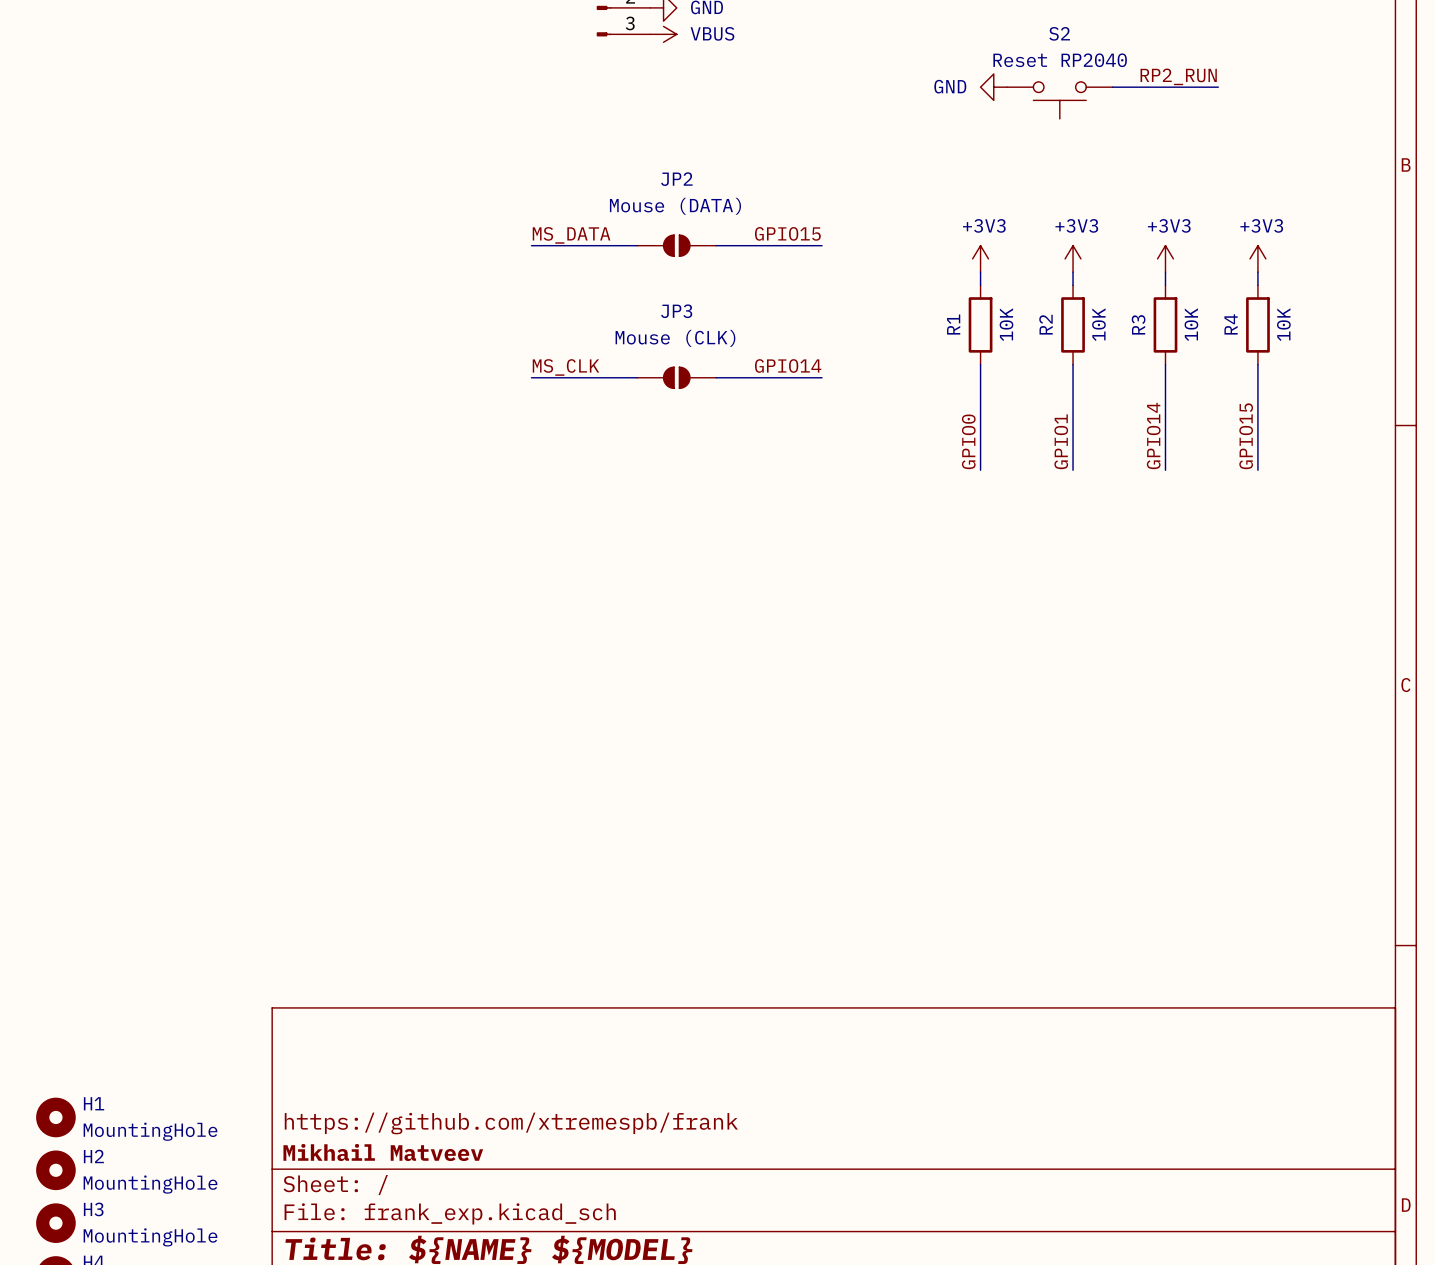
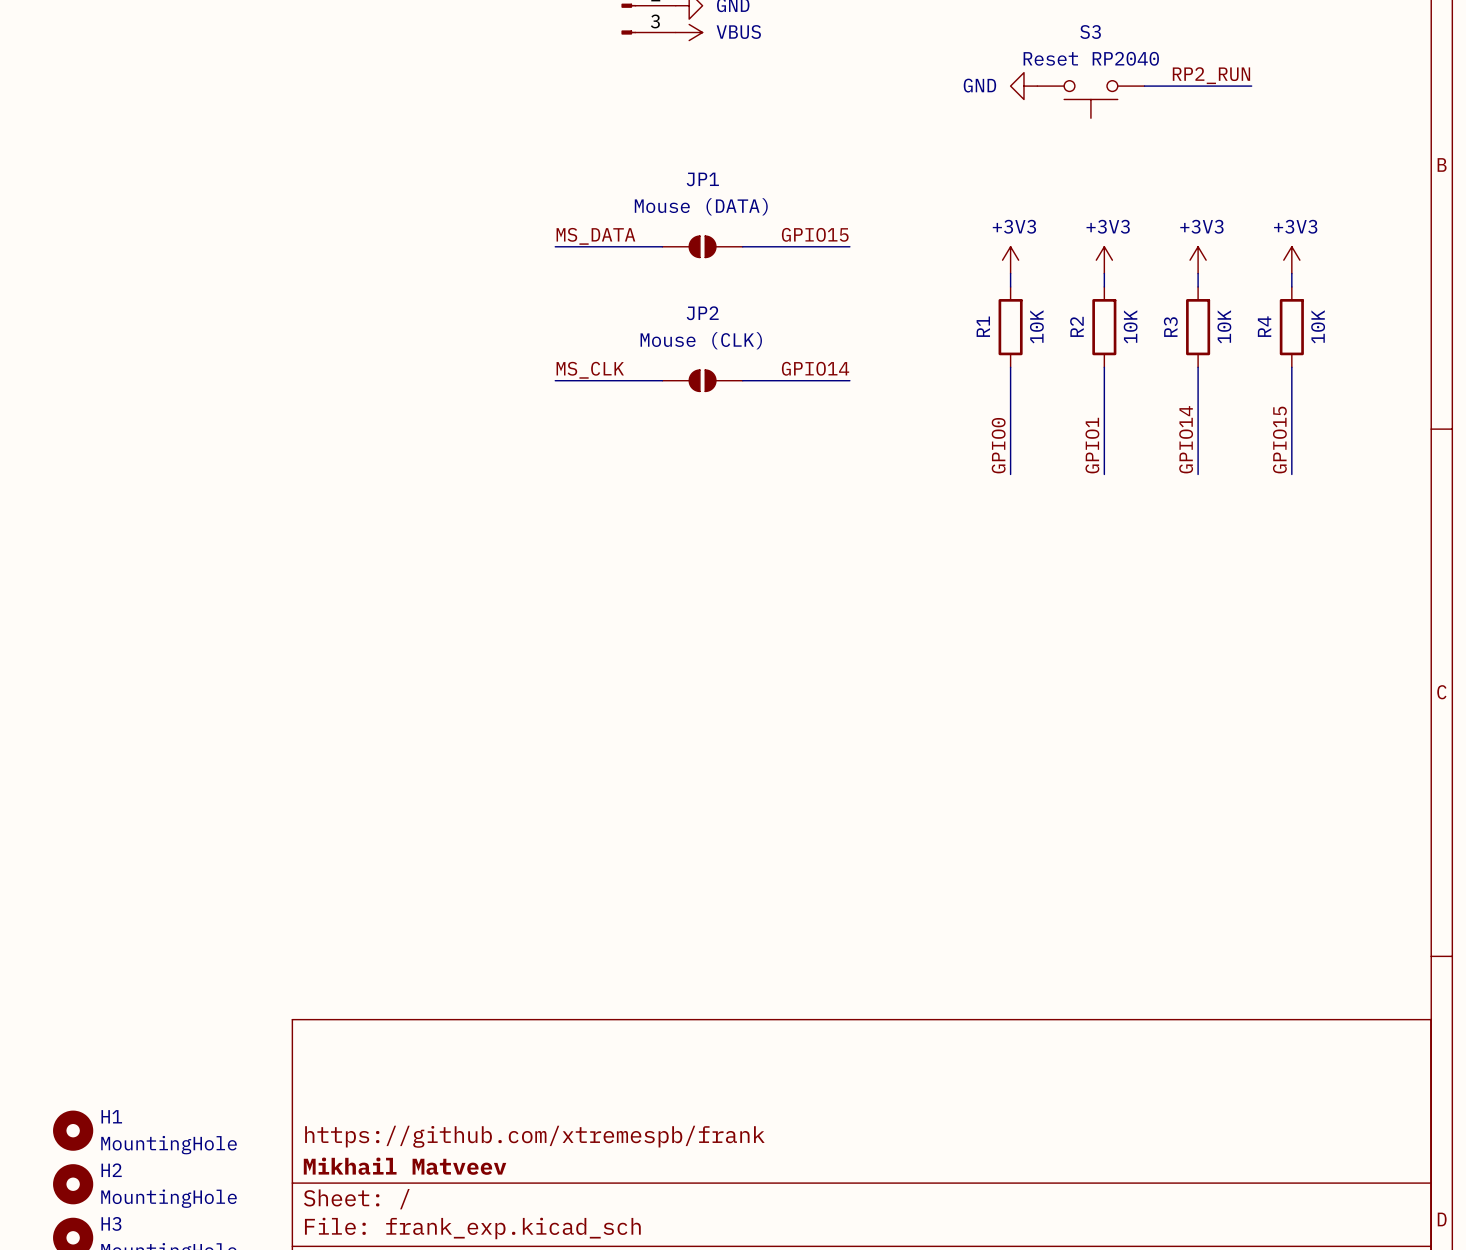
S2 name: S2 (1059, 33) -> S3 (1090, 32)
JP2 name: JP2 (676, 179) -> JP1 (702, 179)
JP3 name: JP3 (676, 311) -> JP2 (702, 313)

